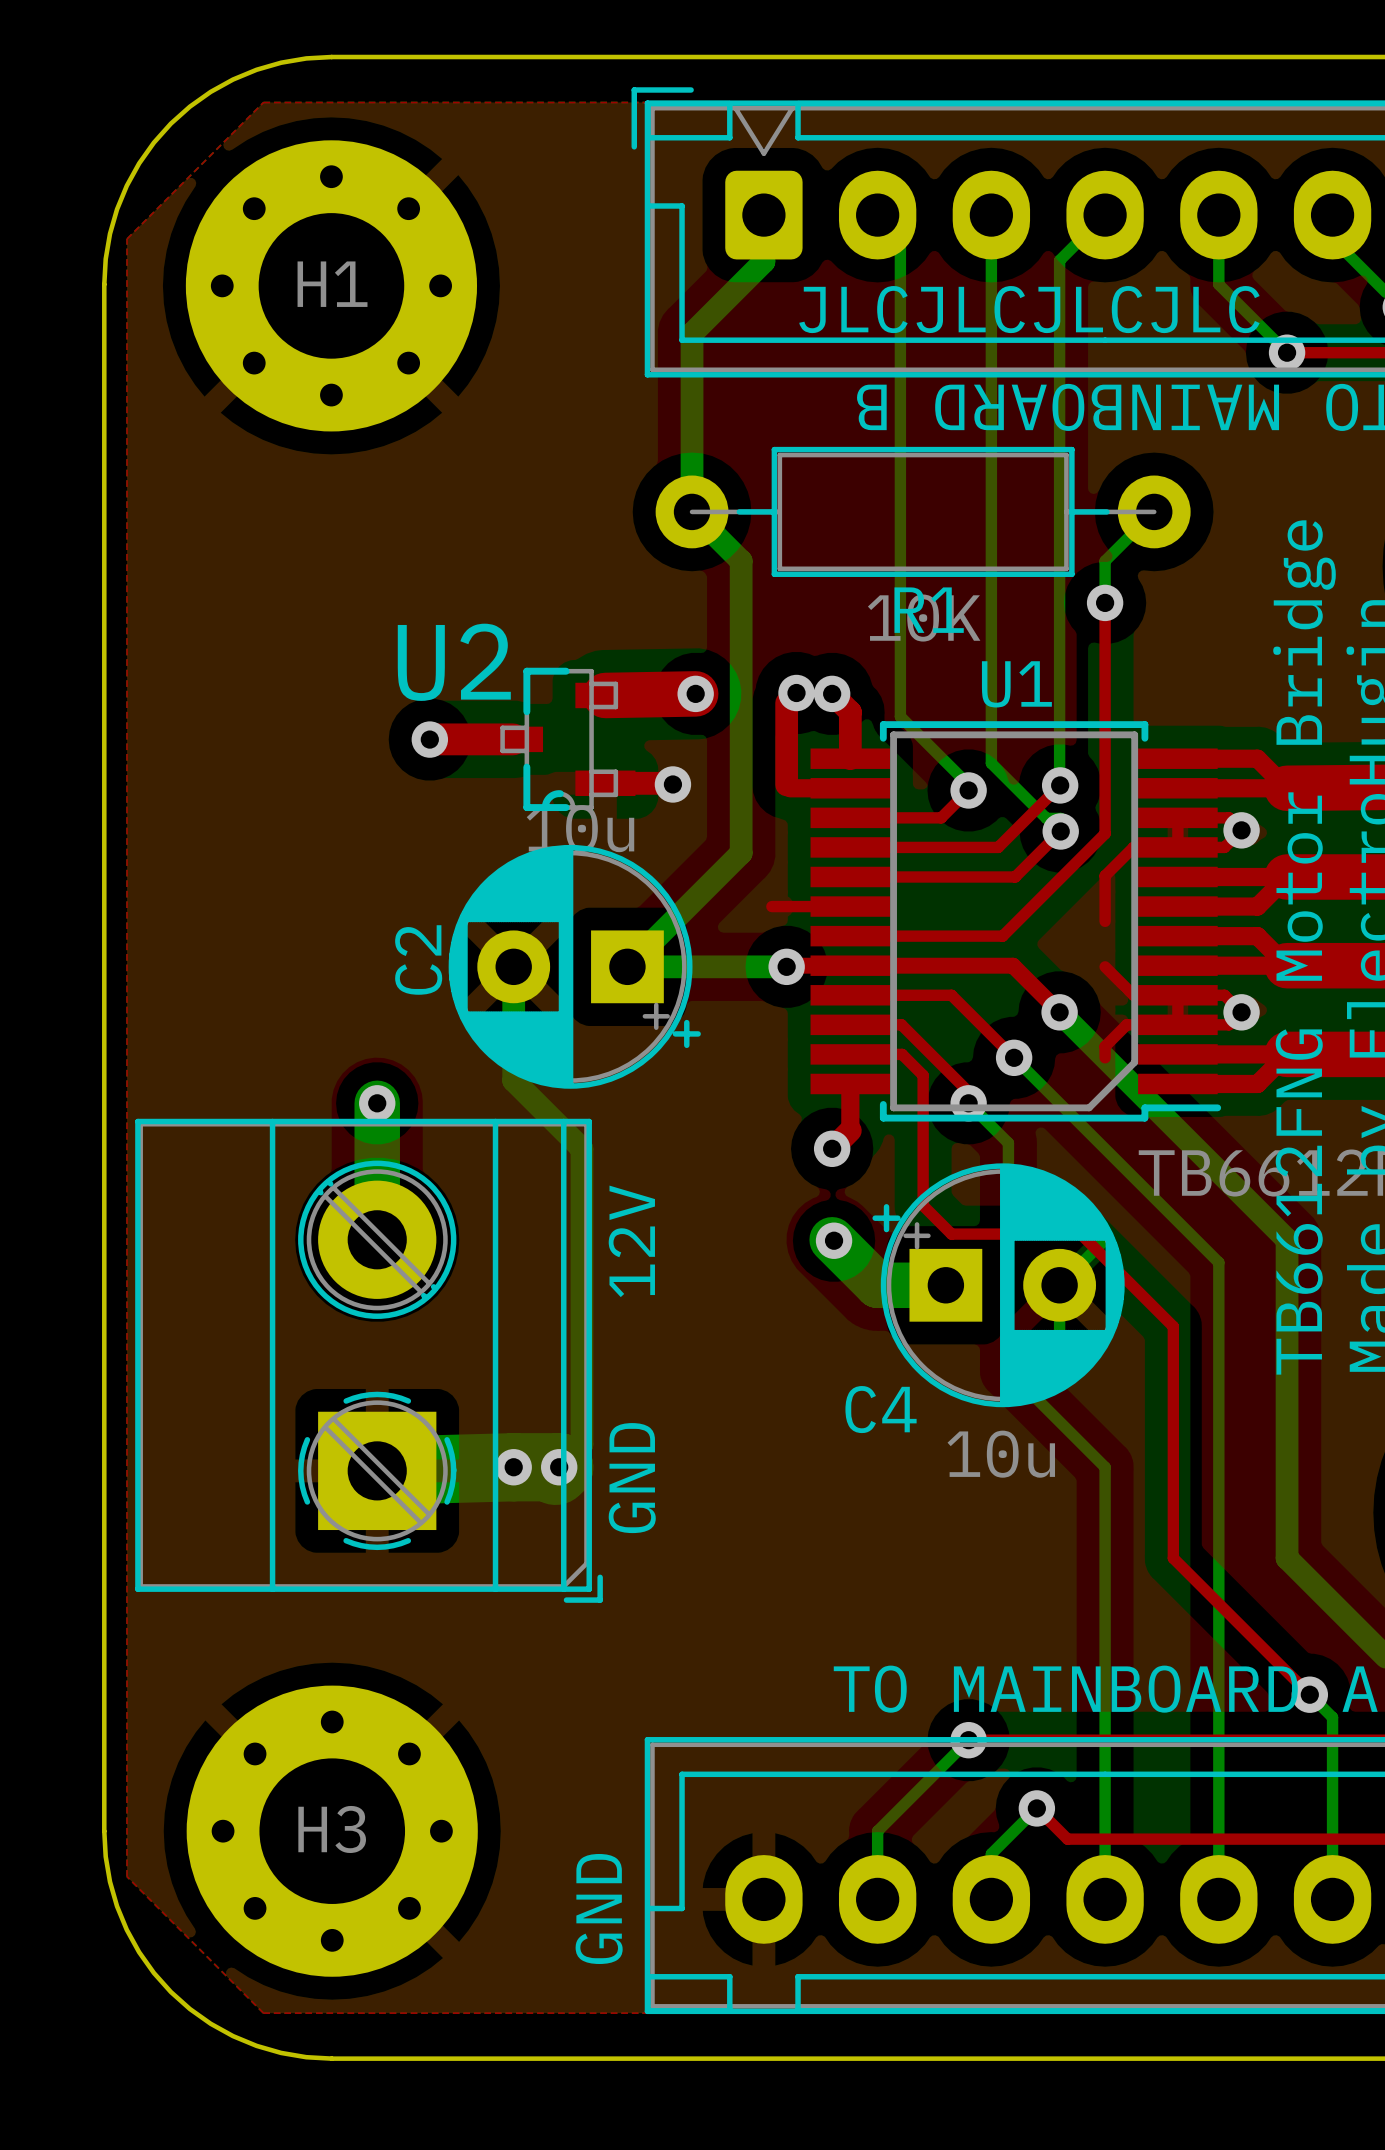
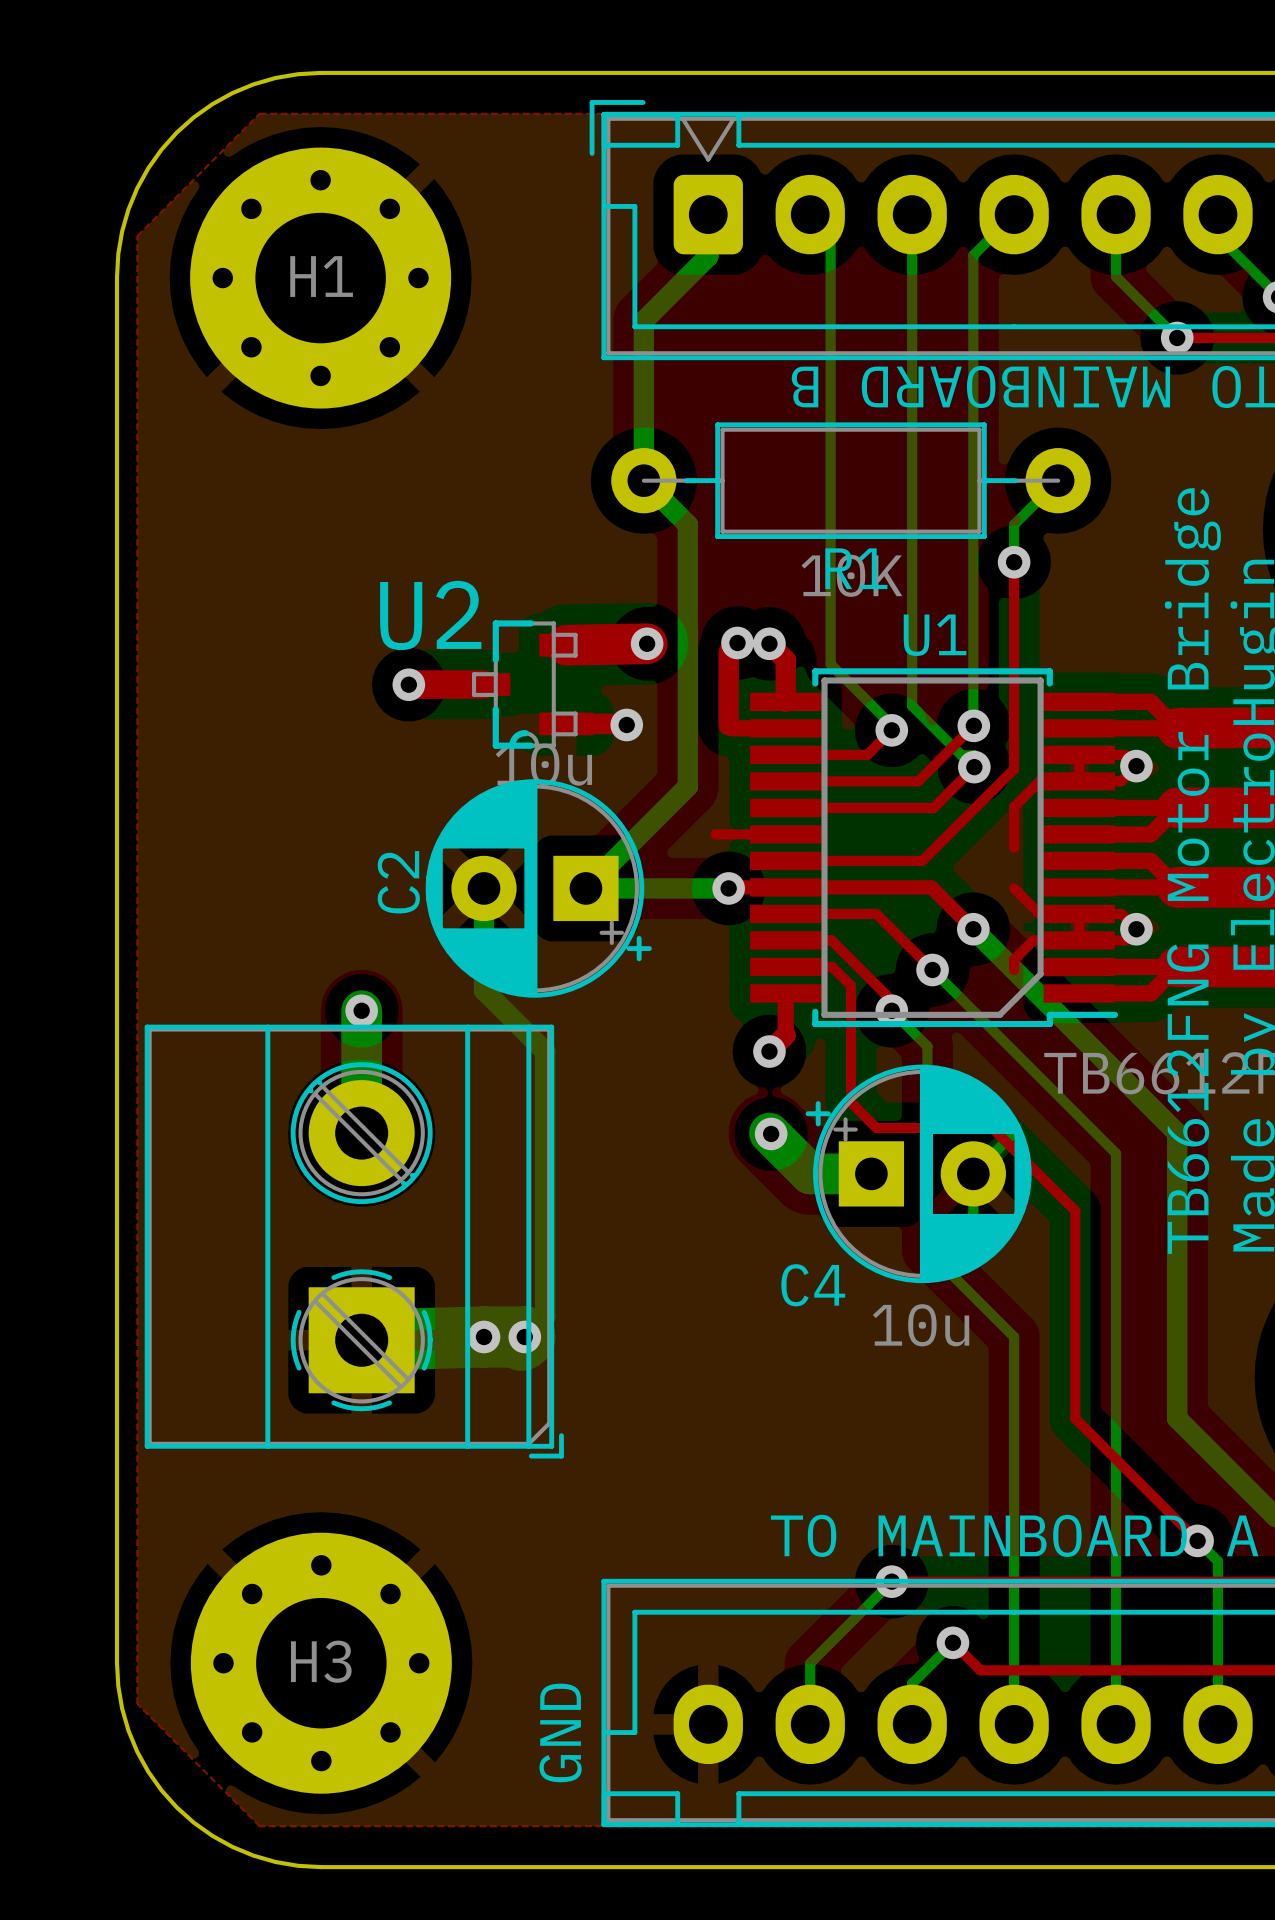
text: JLCJLCJLCJLC (1029, 309) -> none
text: 12V (631, 1241) -> none
text: GND (632, 1478) -> none

